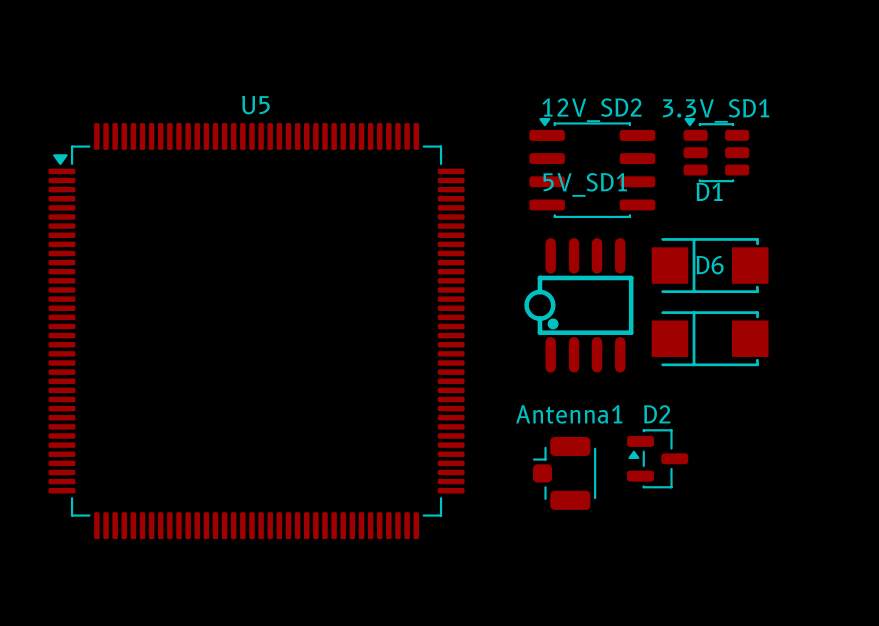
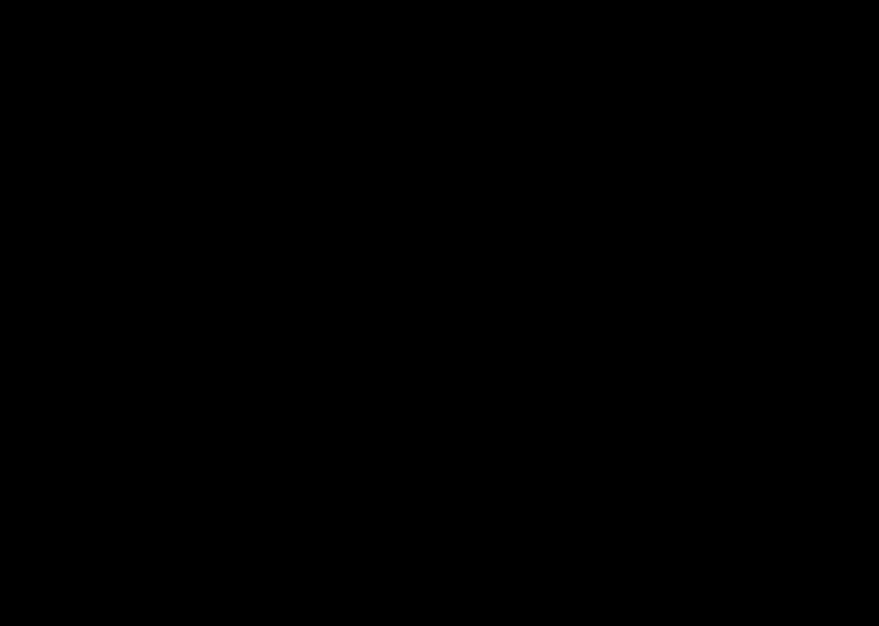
3.3V_SD1: (716, 150) -> none
12V_SD2: (592, 168) -> none
D1: (710, 265) -> none
5V_SD1: (578, 305) -> none
U5: (256, 331) -> none
D6: (710, 338) -> none
D2: (657, 458) -> none
Antenna1: (564, 473) -> none

